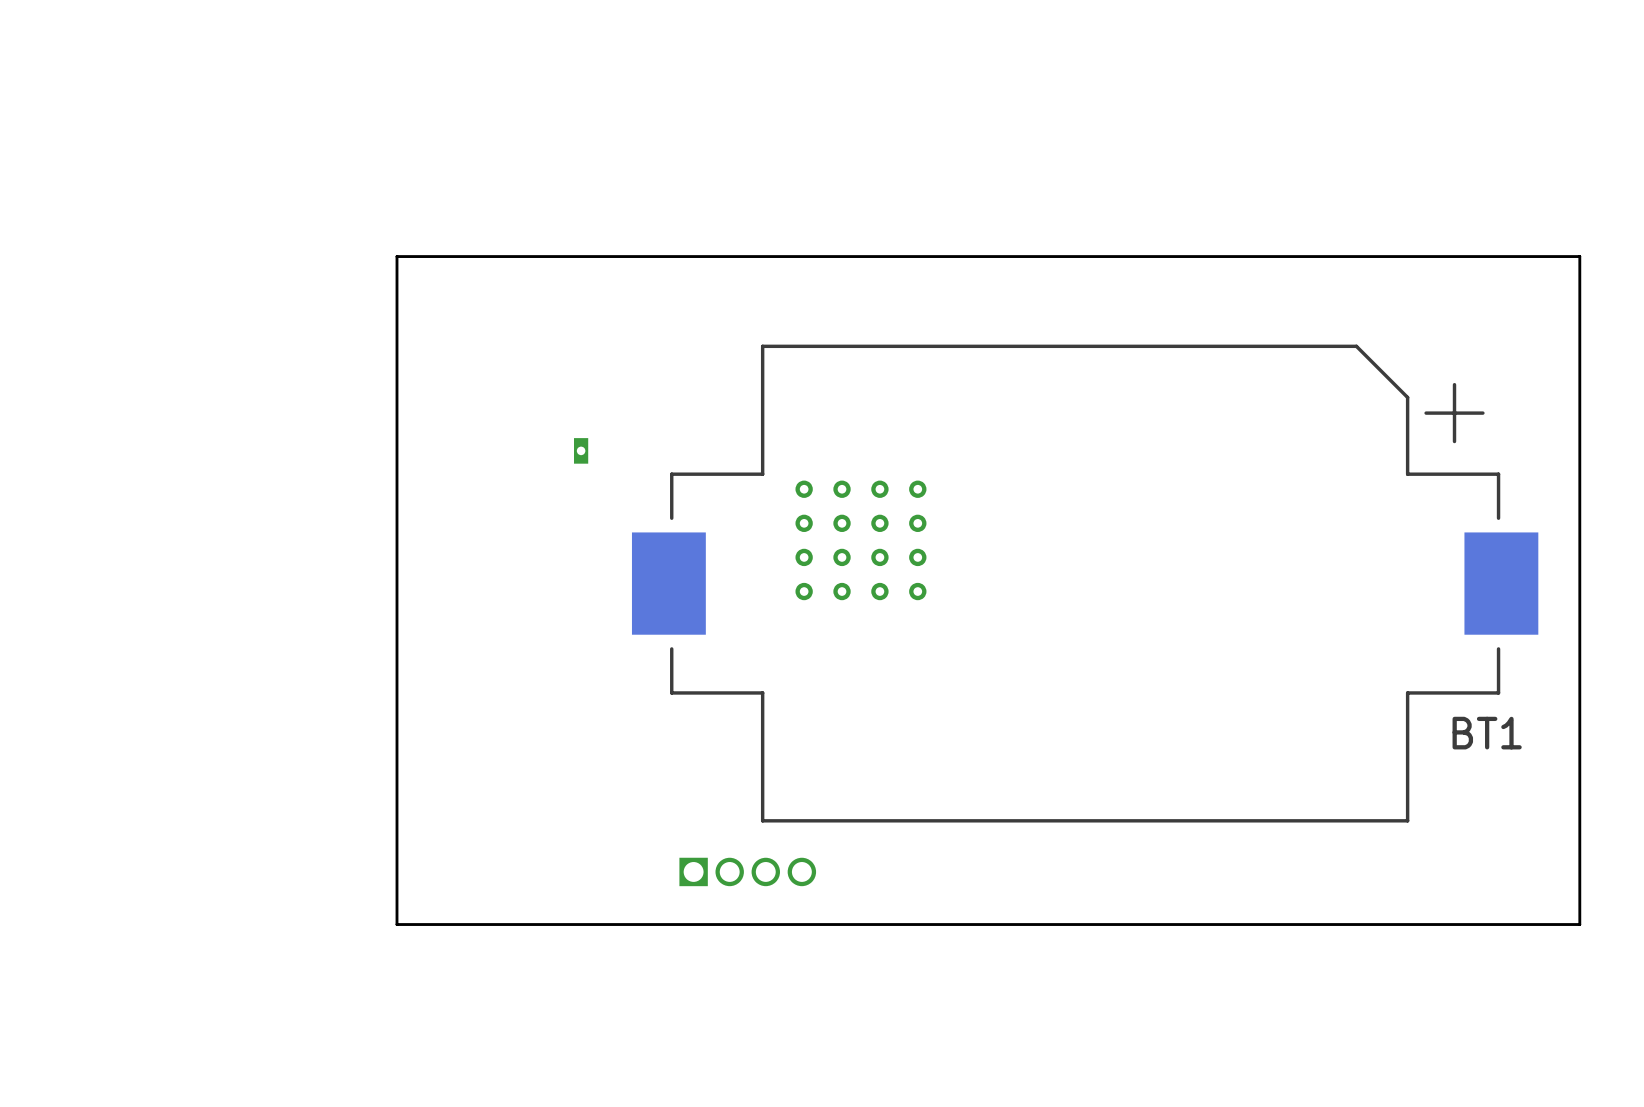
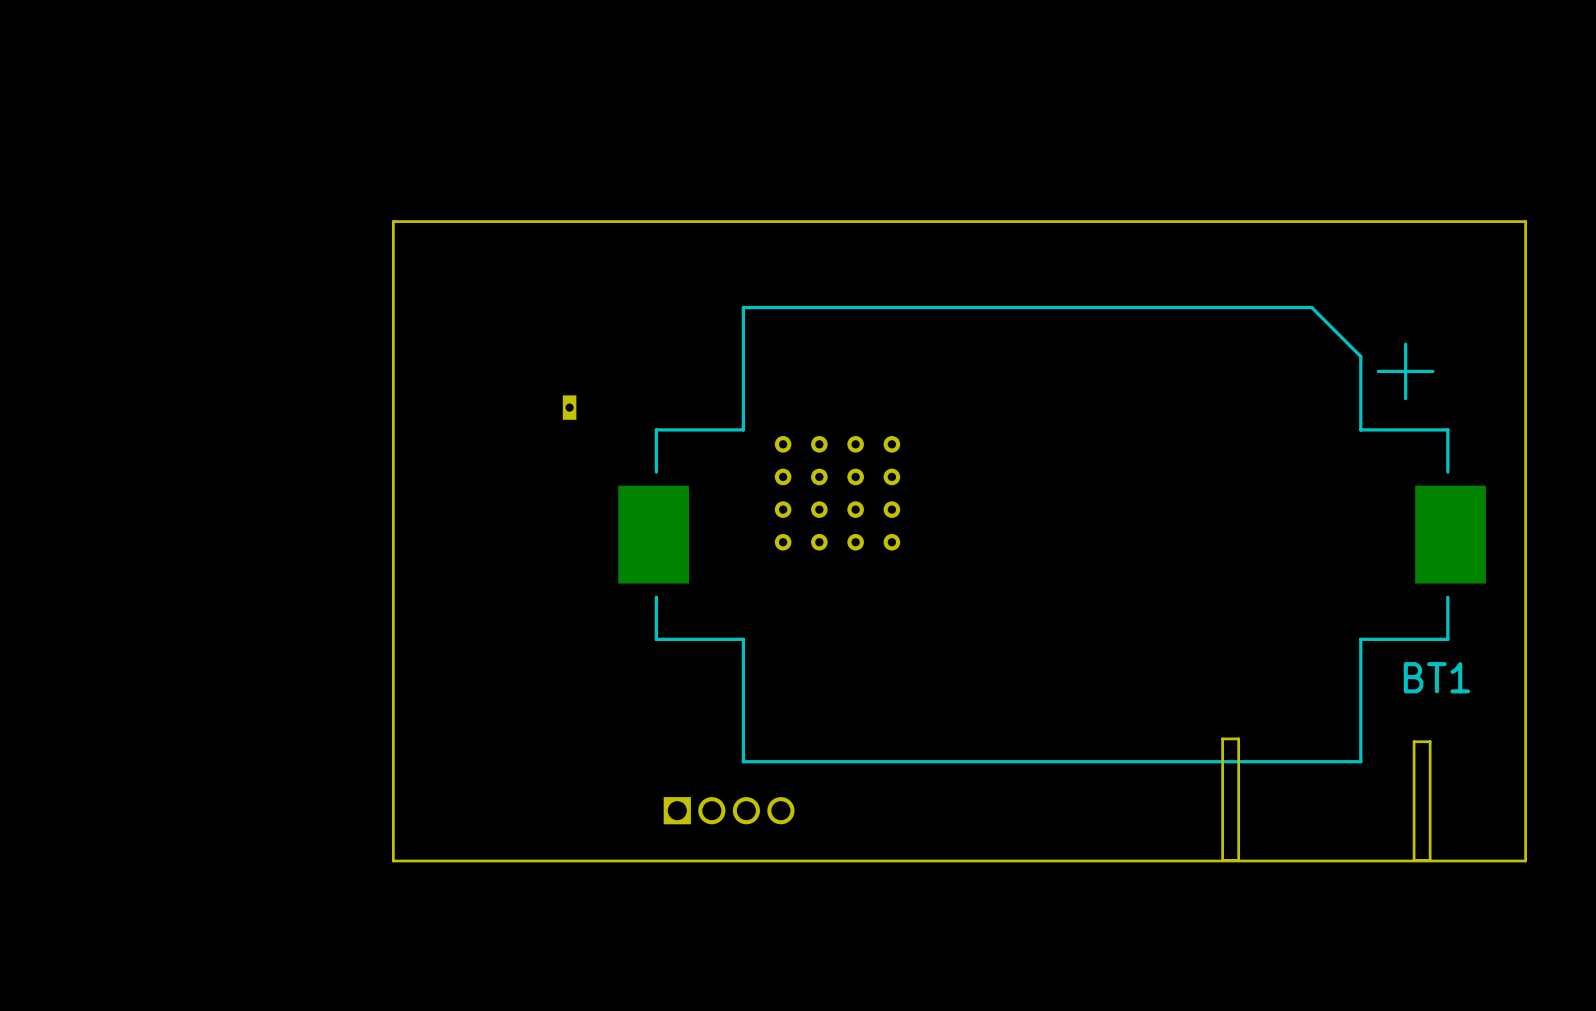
board edge: none -> (1238, 738) (1222, 738) (1222, 860) (1238, 860) (1238, 738)
board edge: none -> (1430, 741) (1414, 741) (1414, 860) (1430, 860) (1430, 741)

